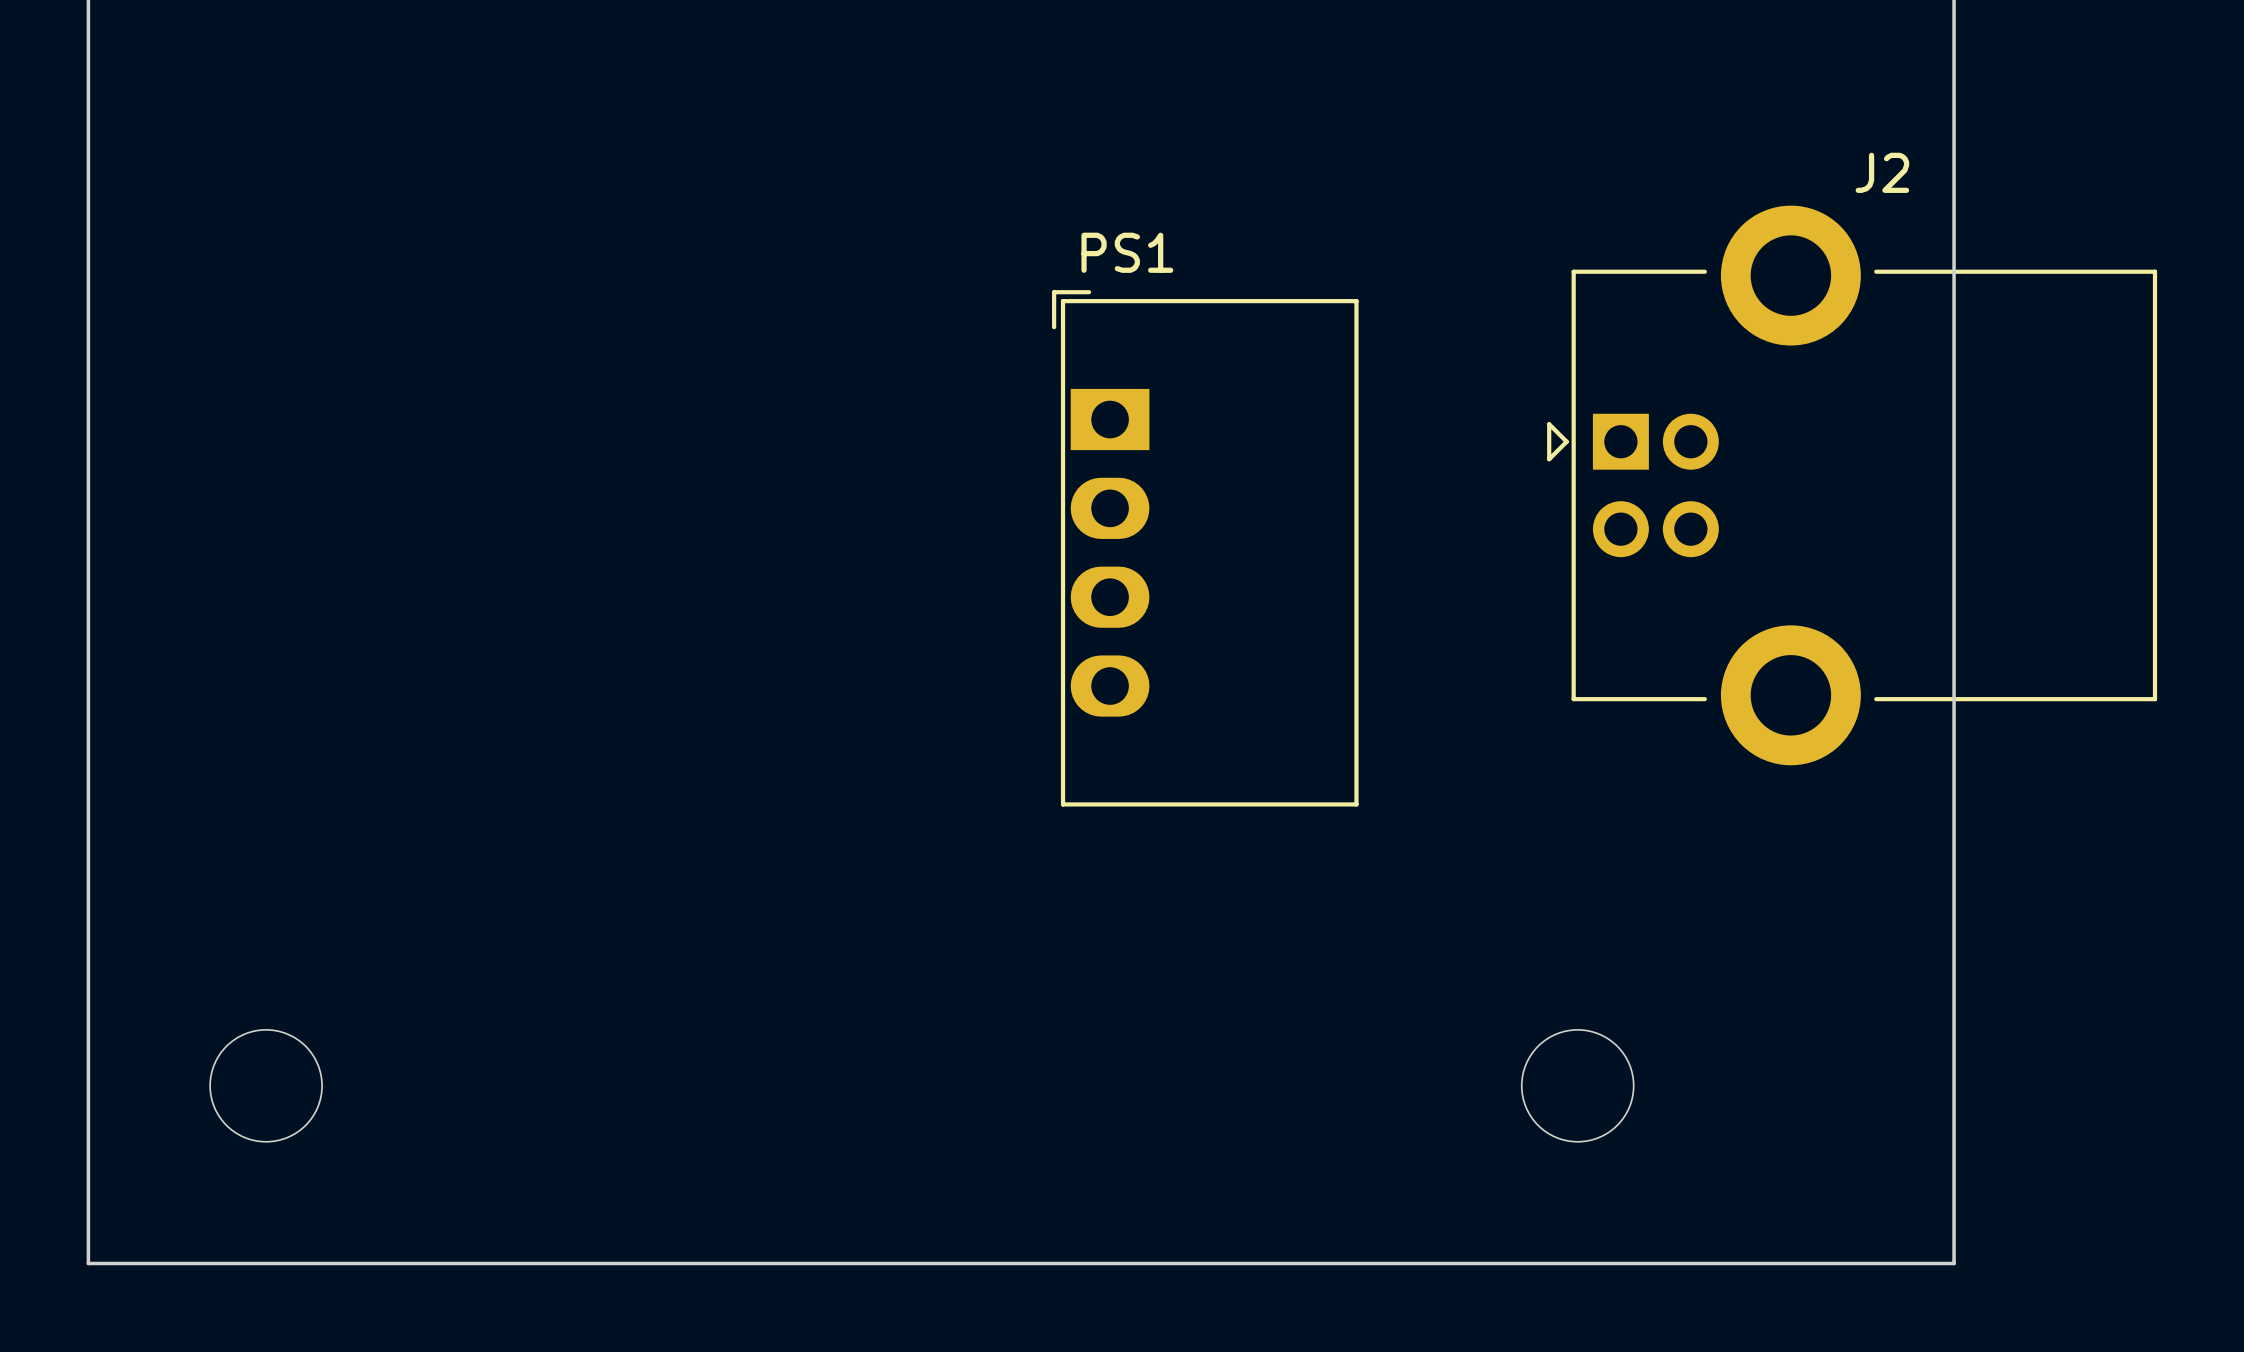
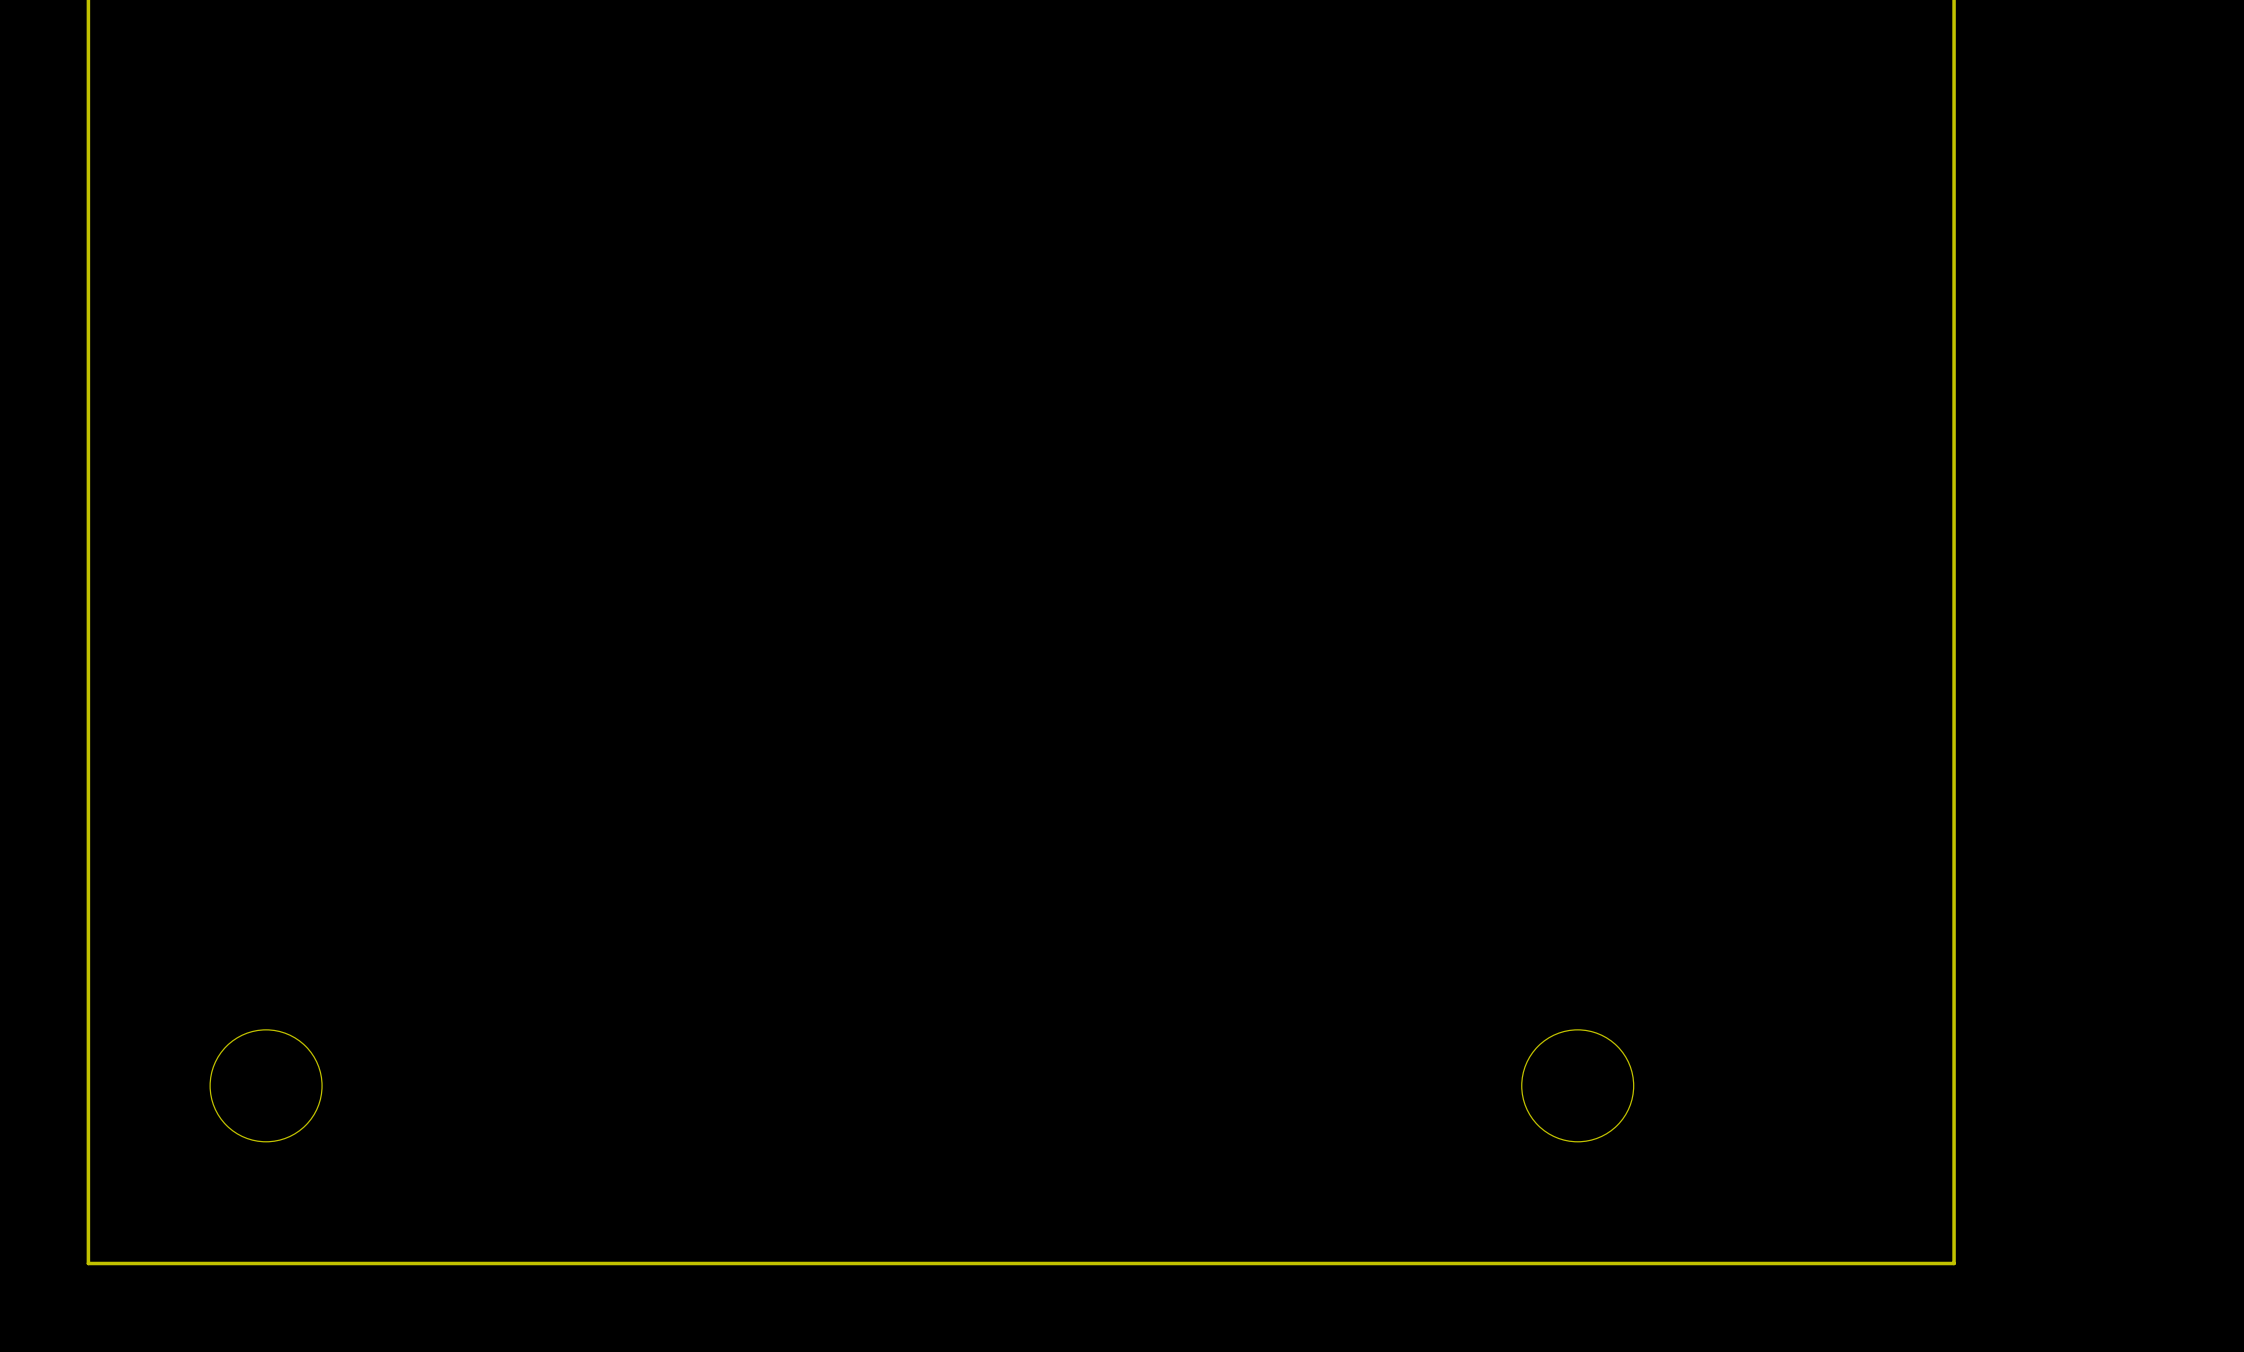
J2: (1852, 485) -> none
PS1: (1205, 548) -> none

